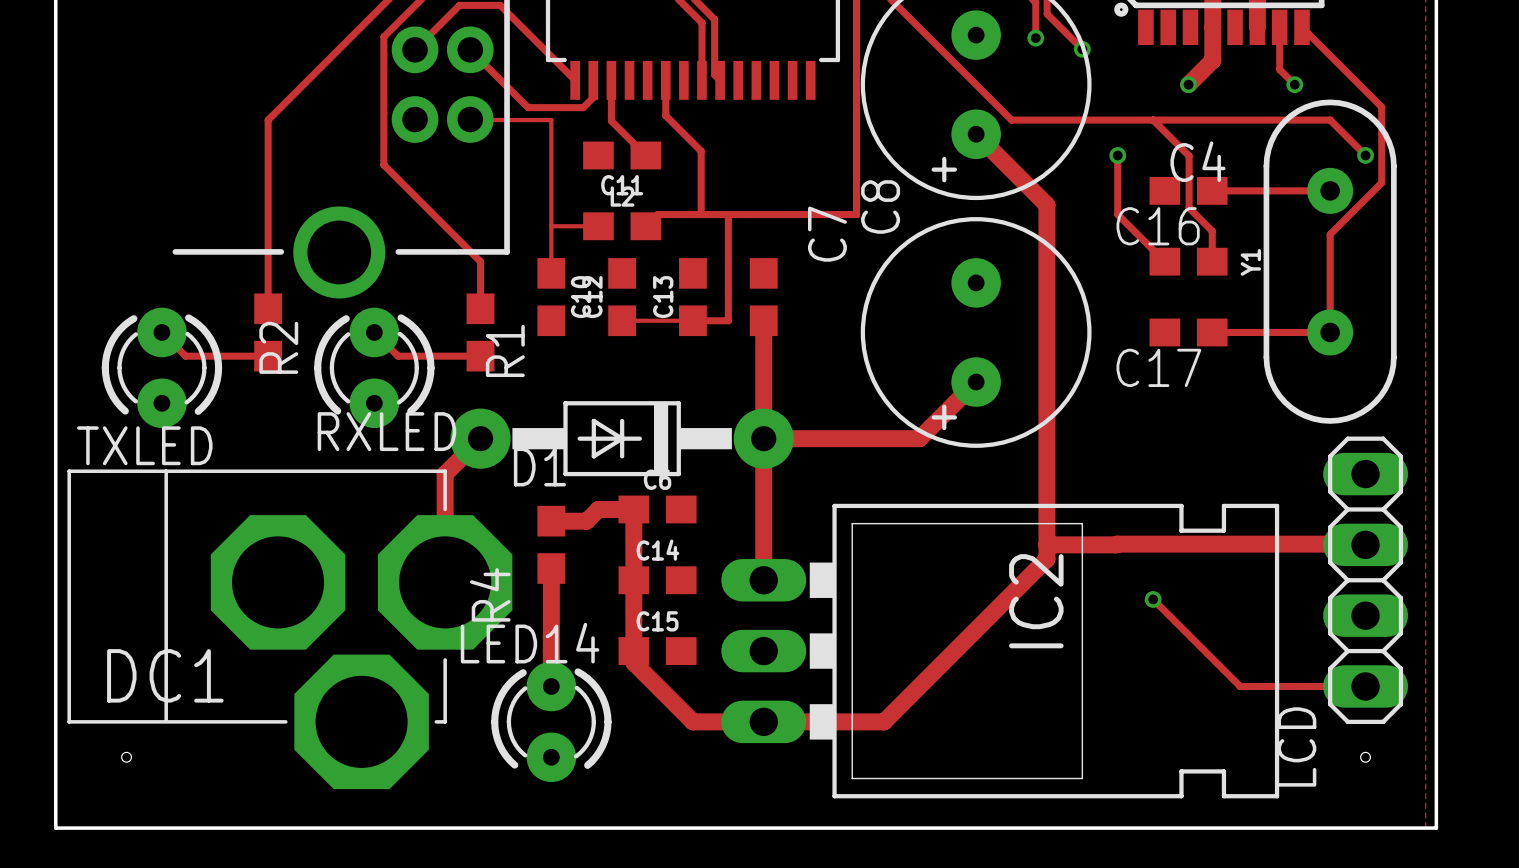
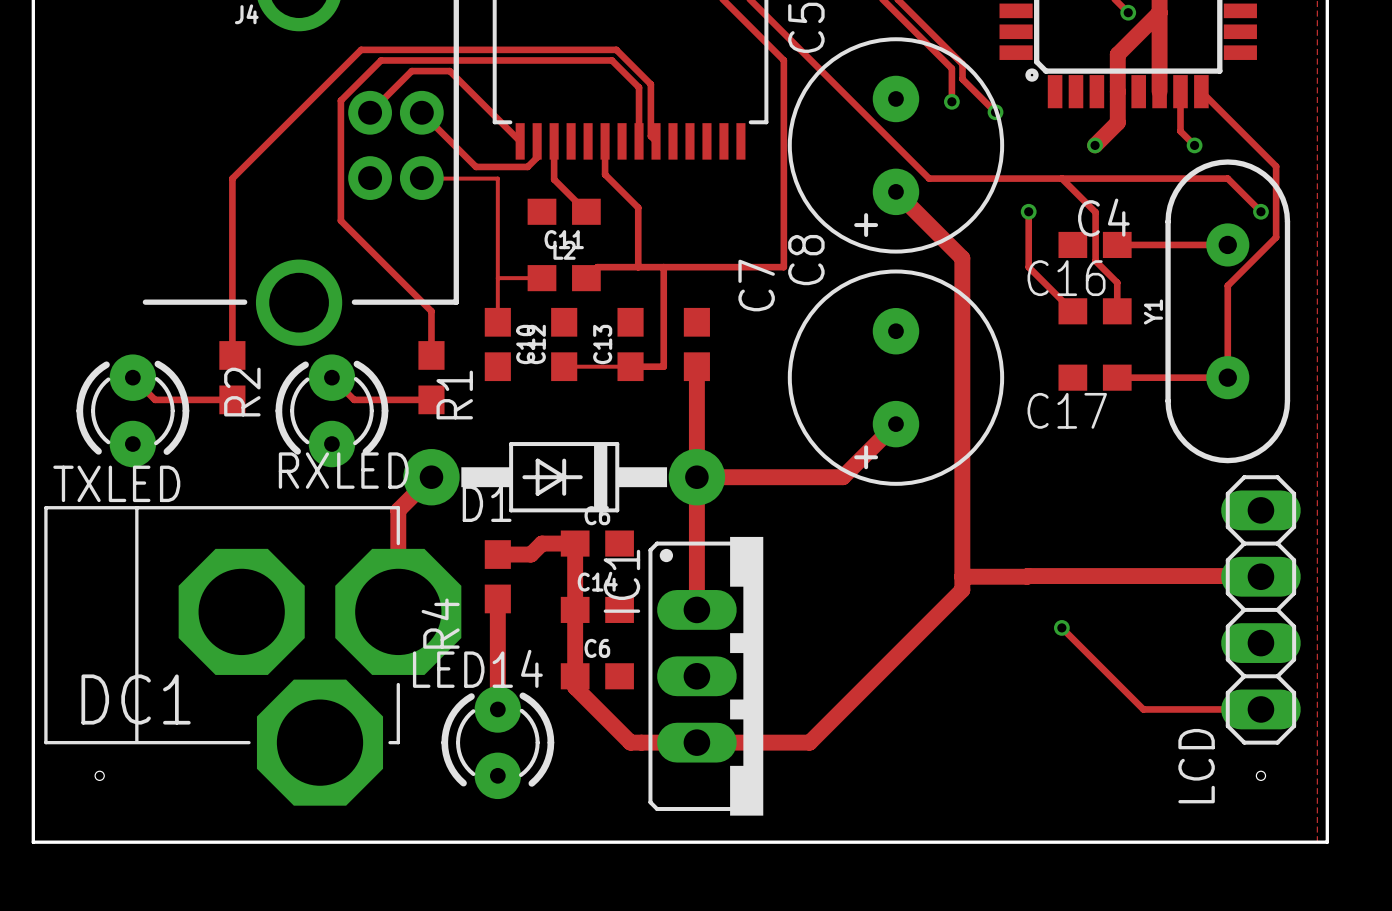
C15 name: C15 (657, 621) -> C6 (597, 648)
IC1: none -> (705, 676)
IC2: (1000, 651) -> none

